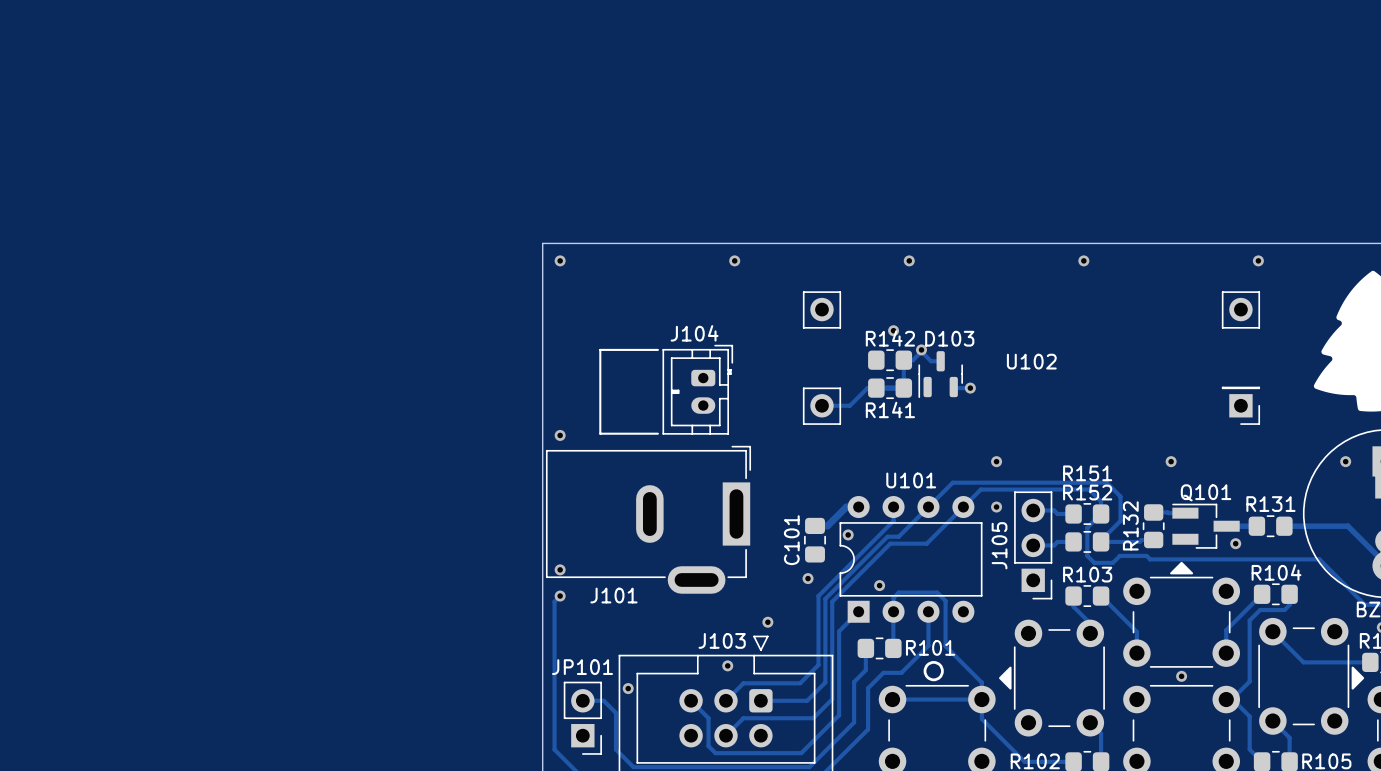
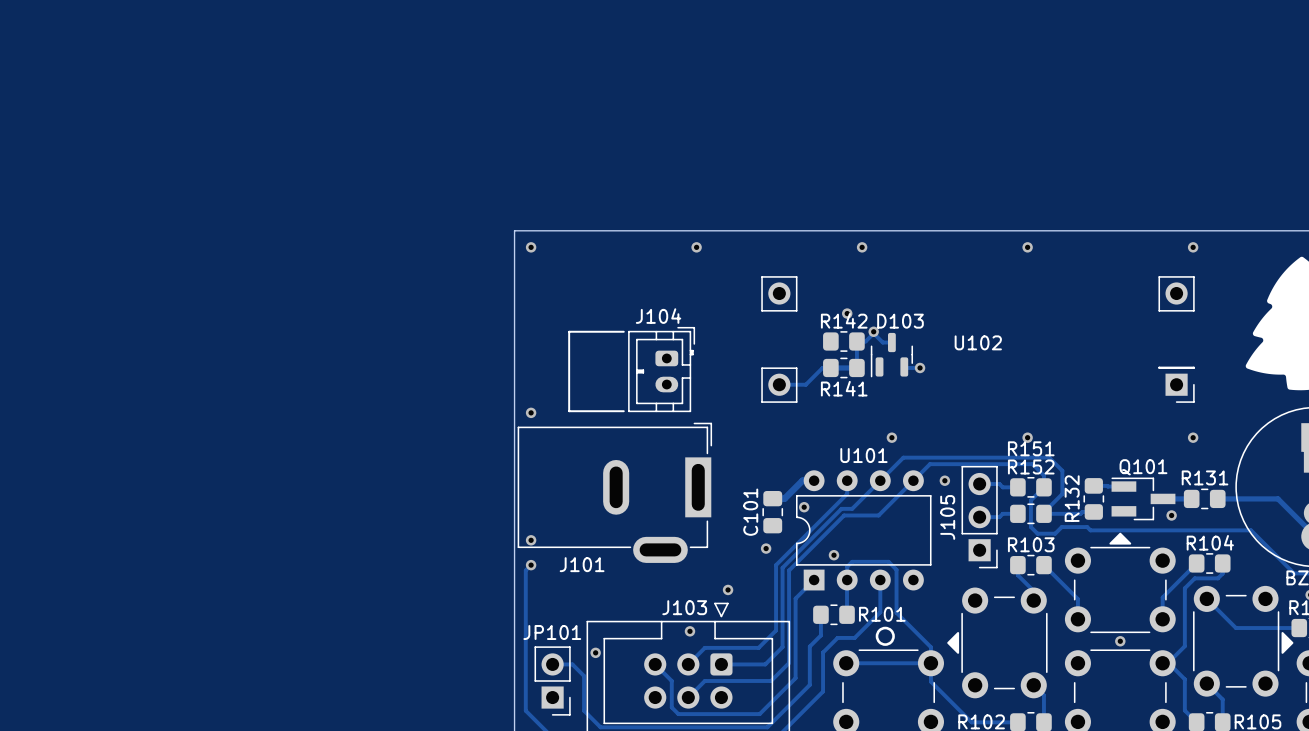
via: none -> (891, 437)
via: (996, 461) -> none
via: none -> (1027, 437)
via: (1171, 461) -> none
via: none -> (1193, 437)
via: (1345, 461) -> none

